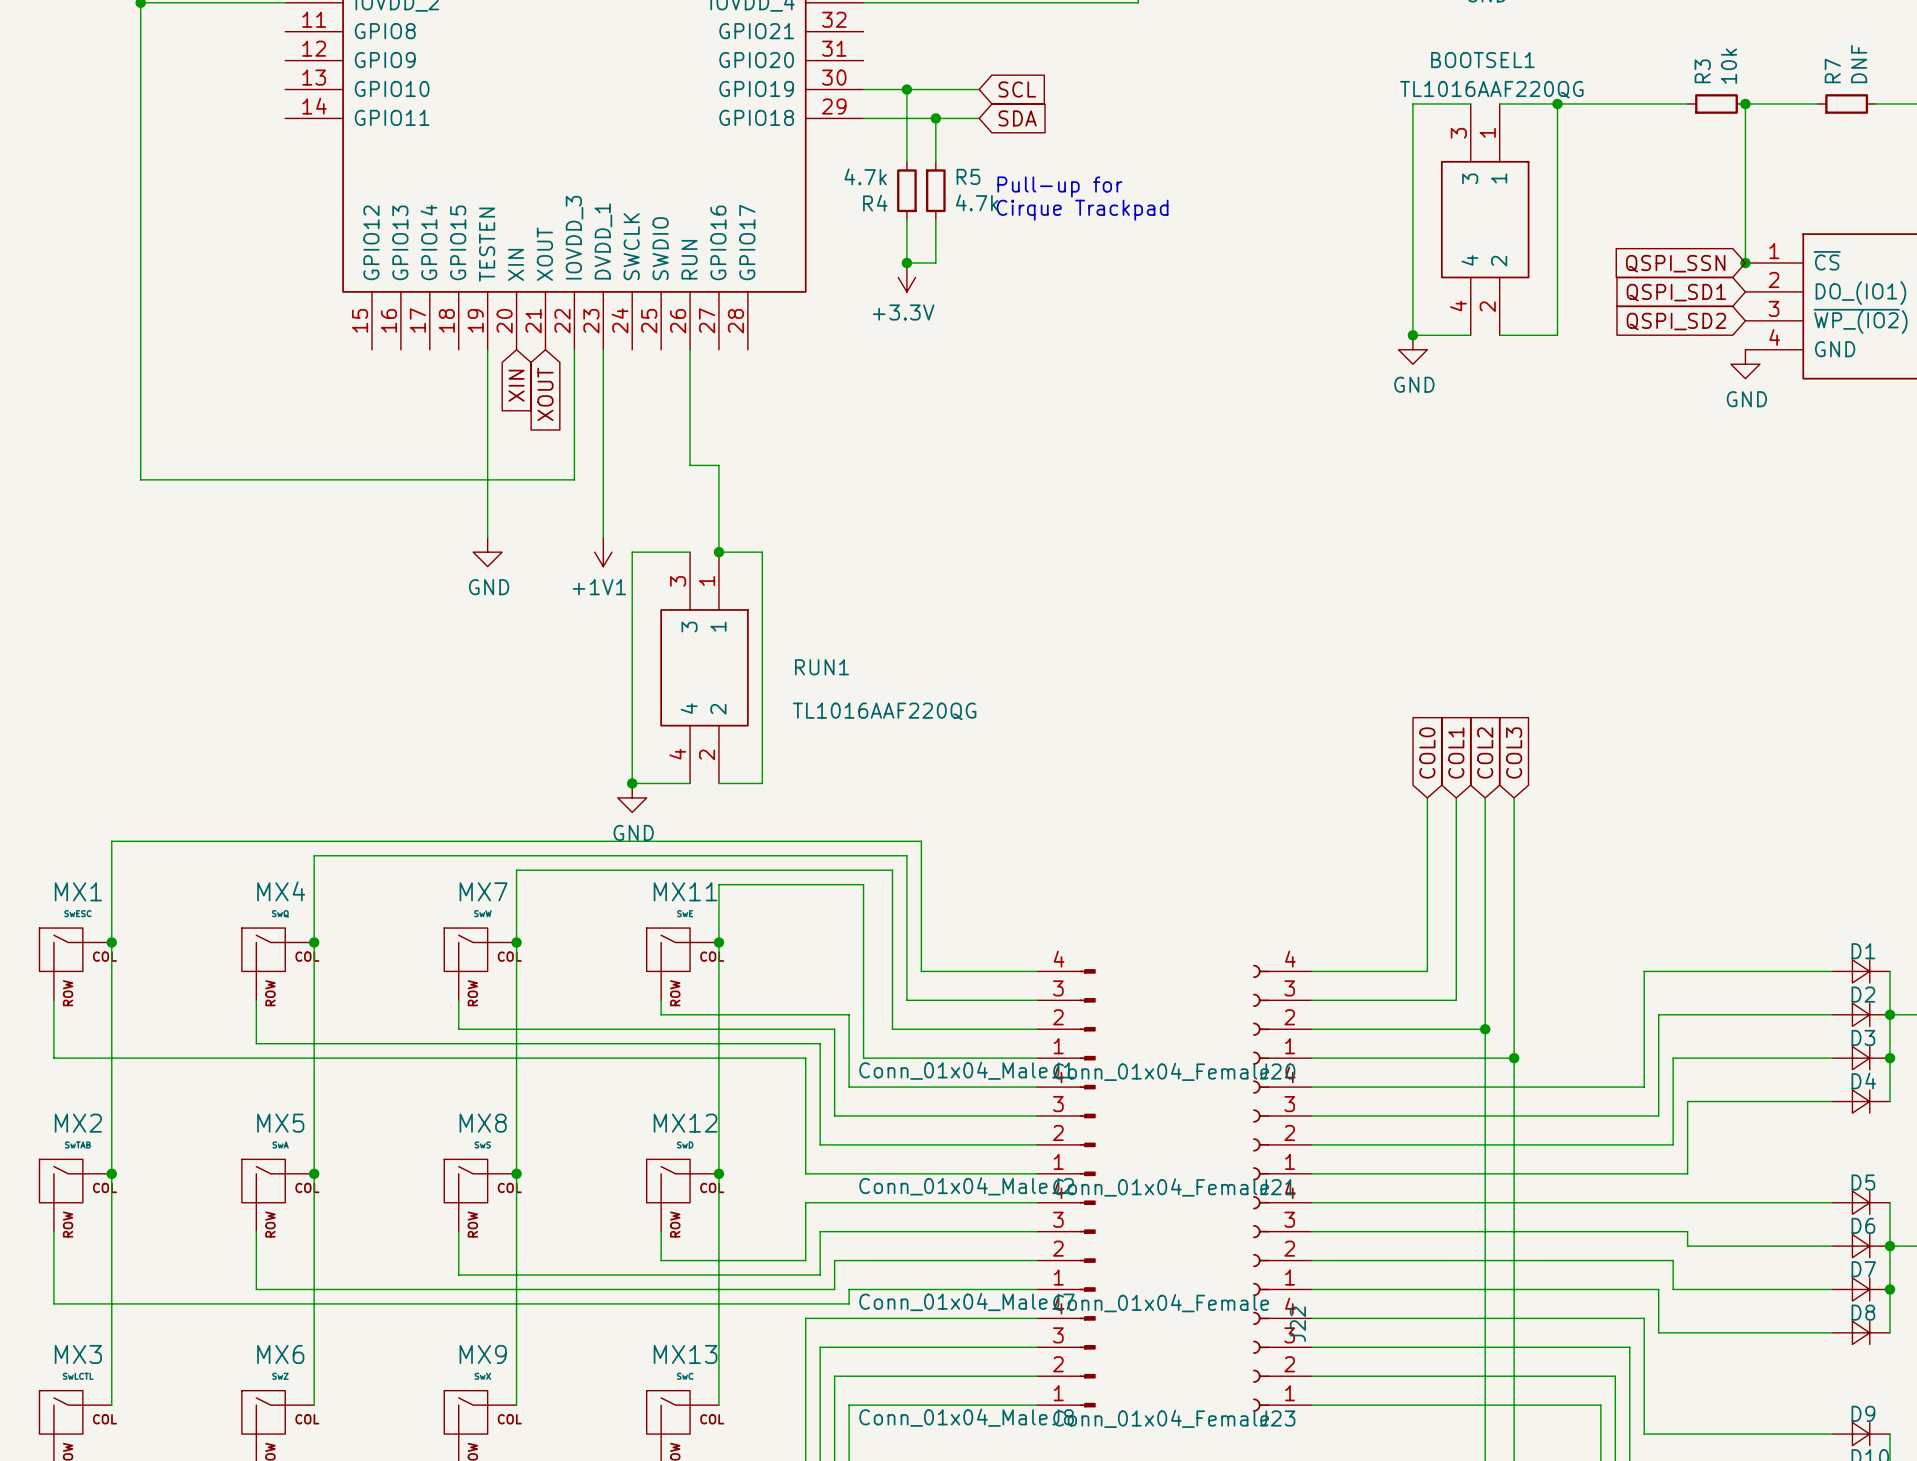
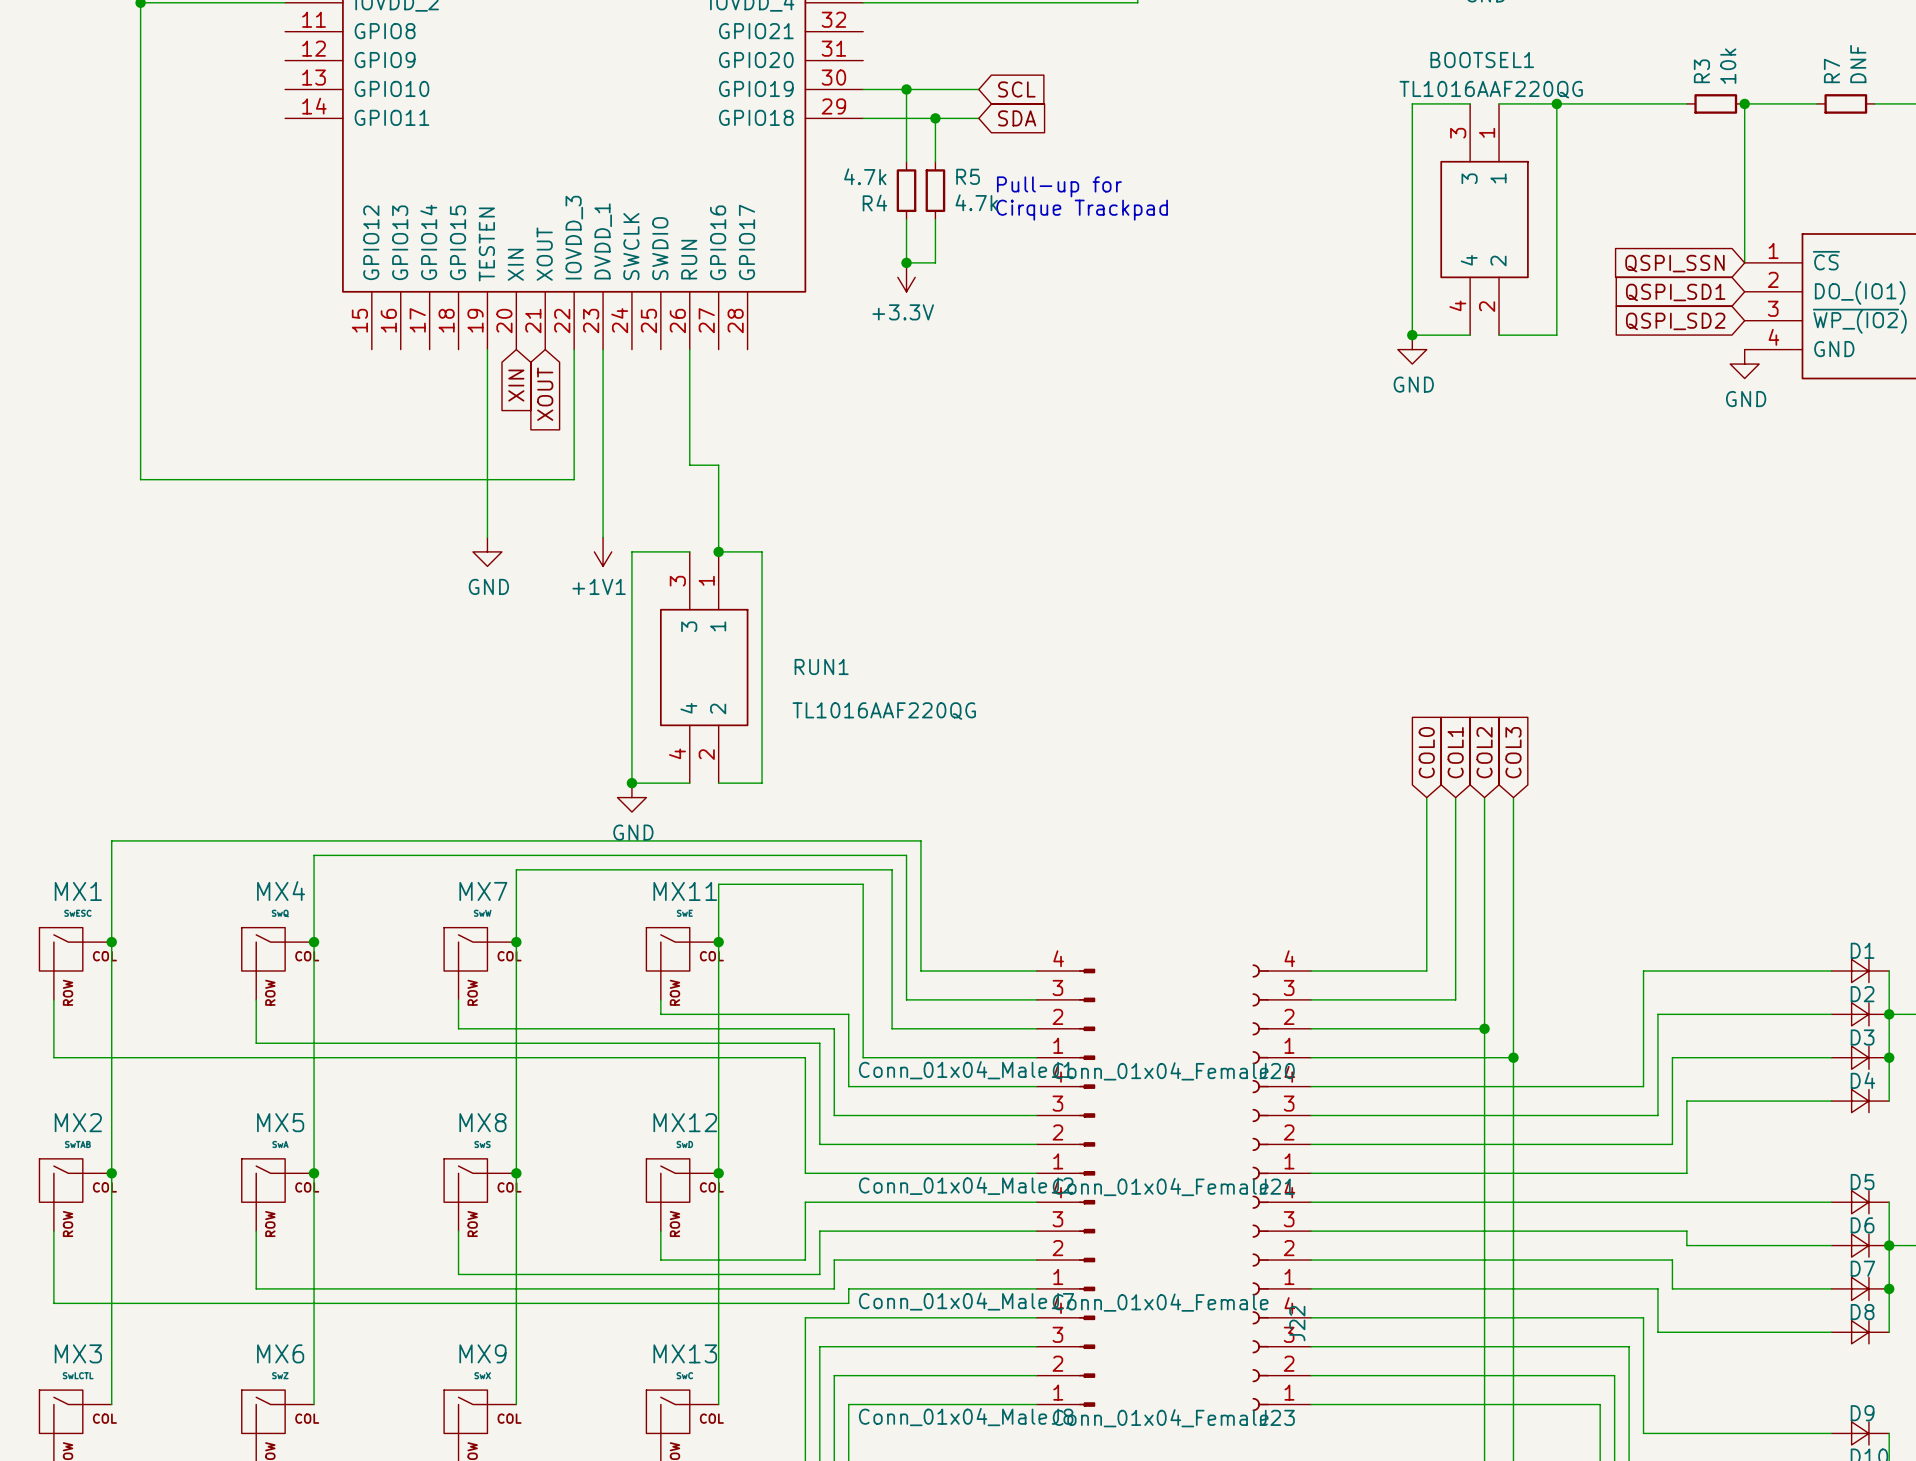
junction: (1745, 263) -> none

